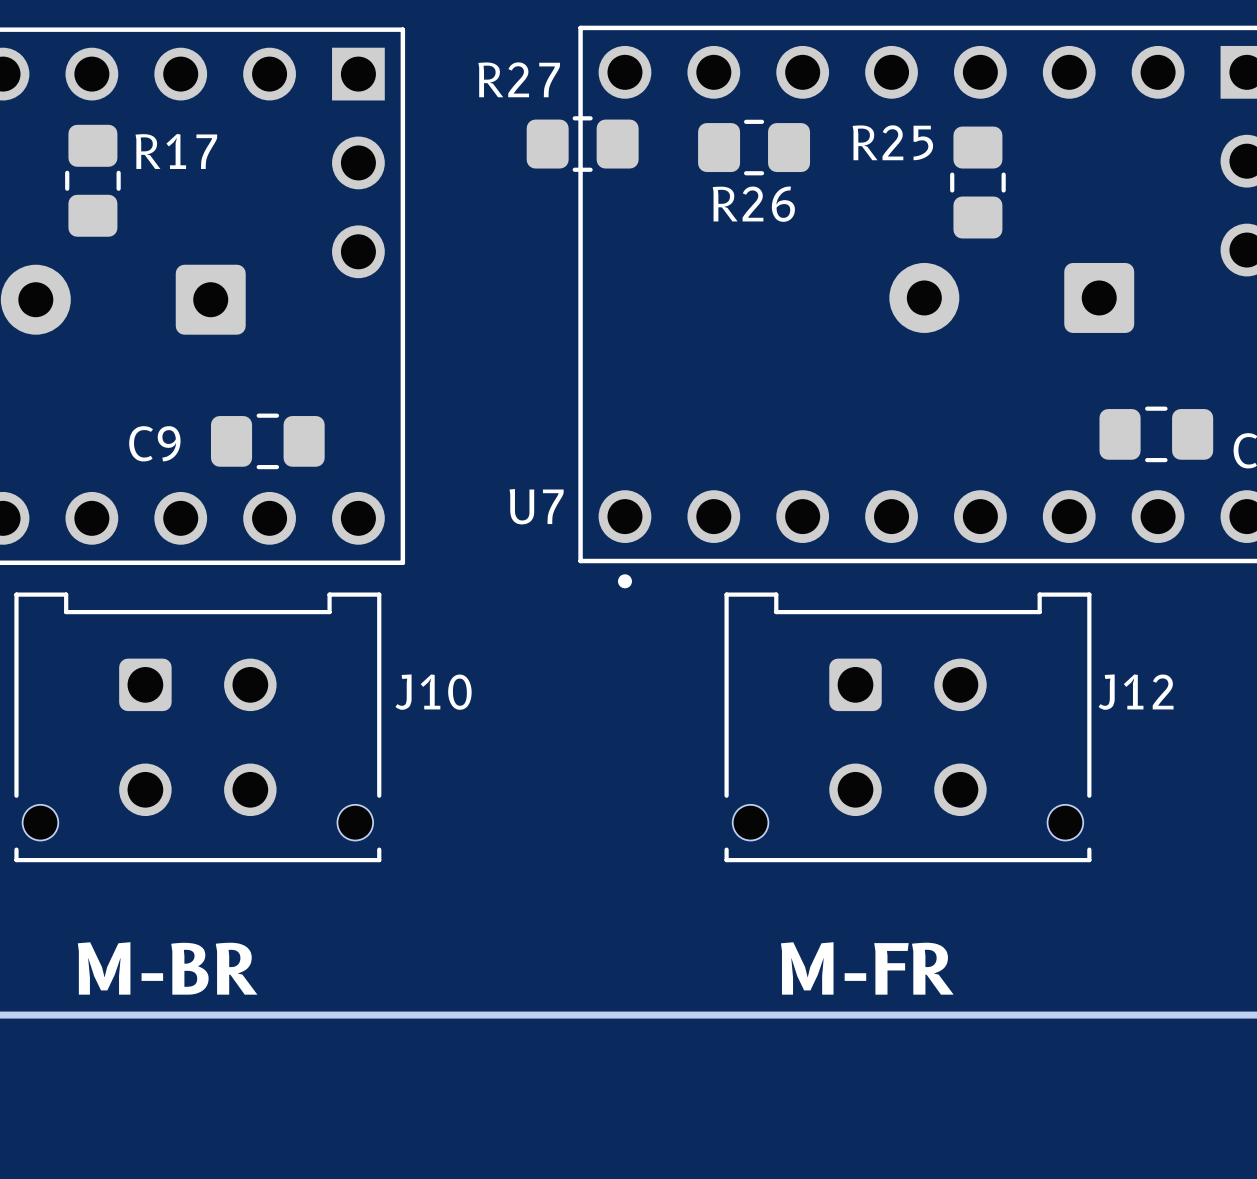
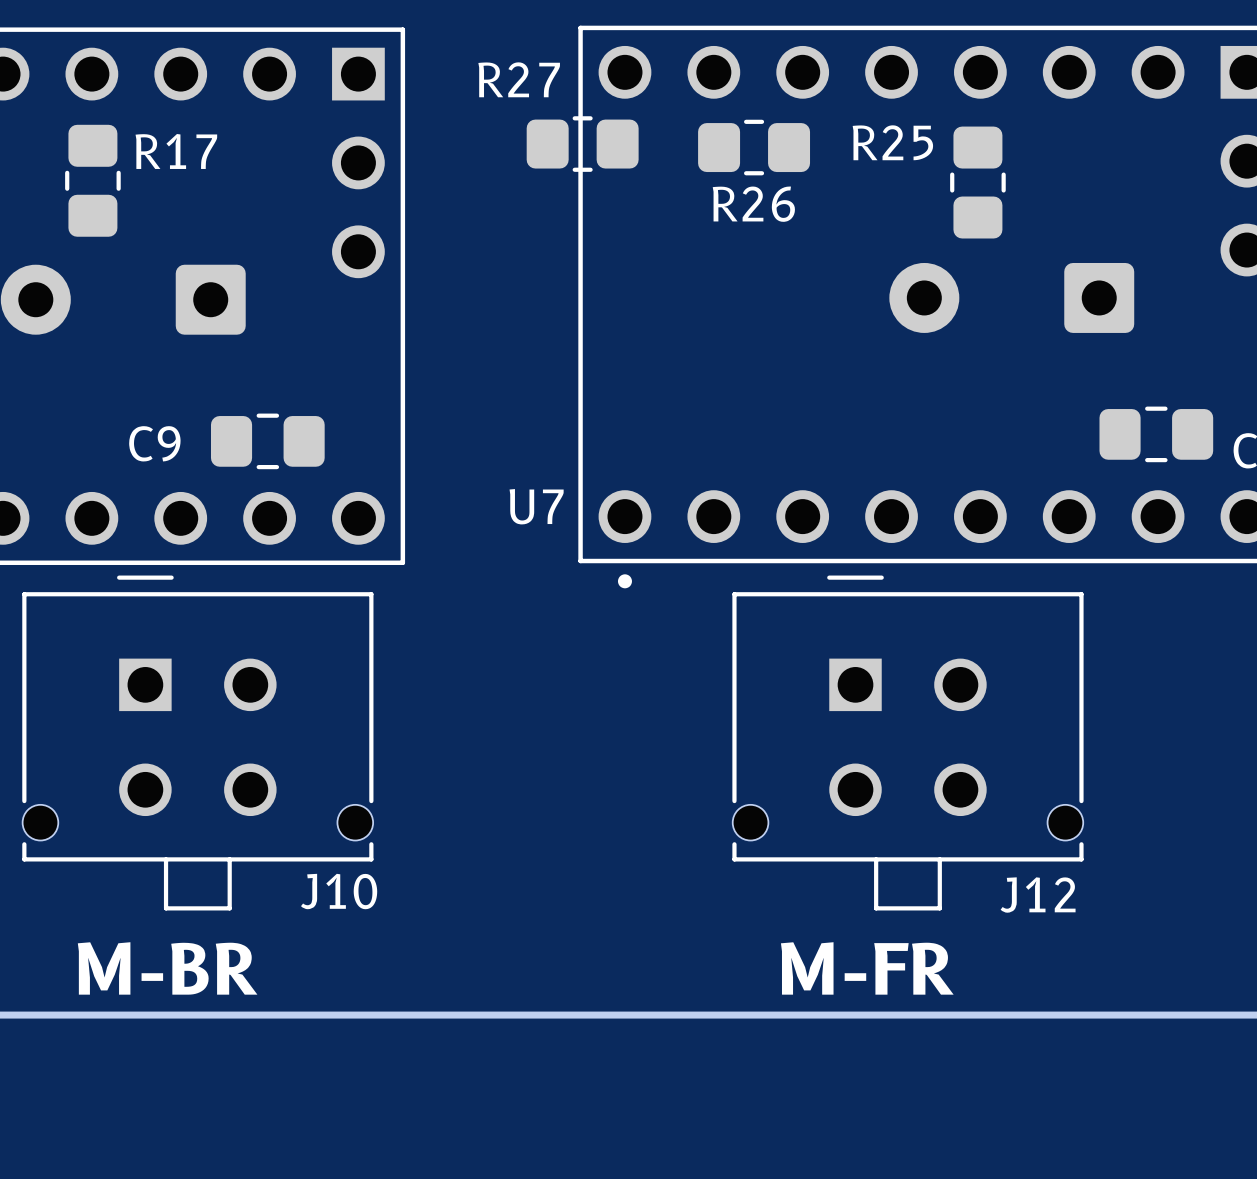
J10 footprint: [14, 592, 382, 863] -> [22, 575, 374, 911]
J12 footprint: [724, 592, 1092, 863] -> [732, 575, 1084, 911]
J10 name position: J10 (433, 692) -> J10 (339, 891)
J12 name position: J12 (1136, 692) -> J12 (1038, 895)

